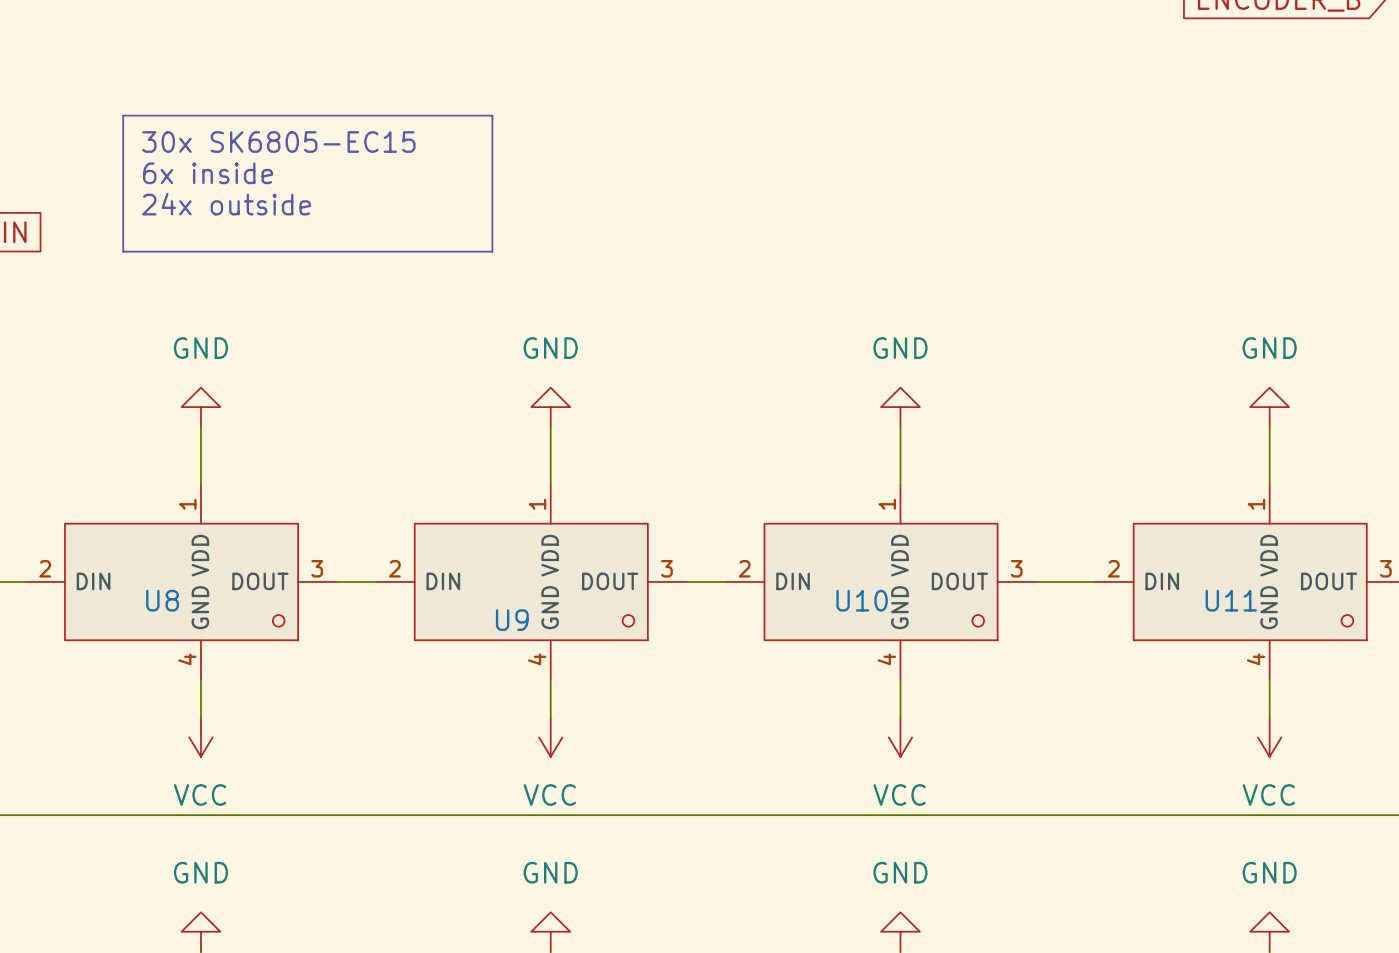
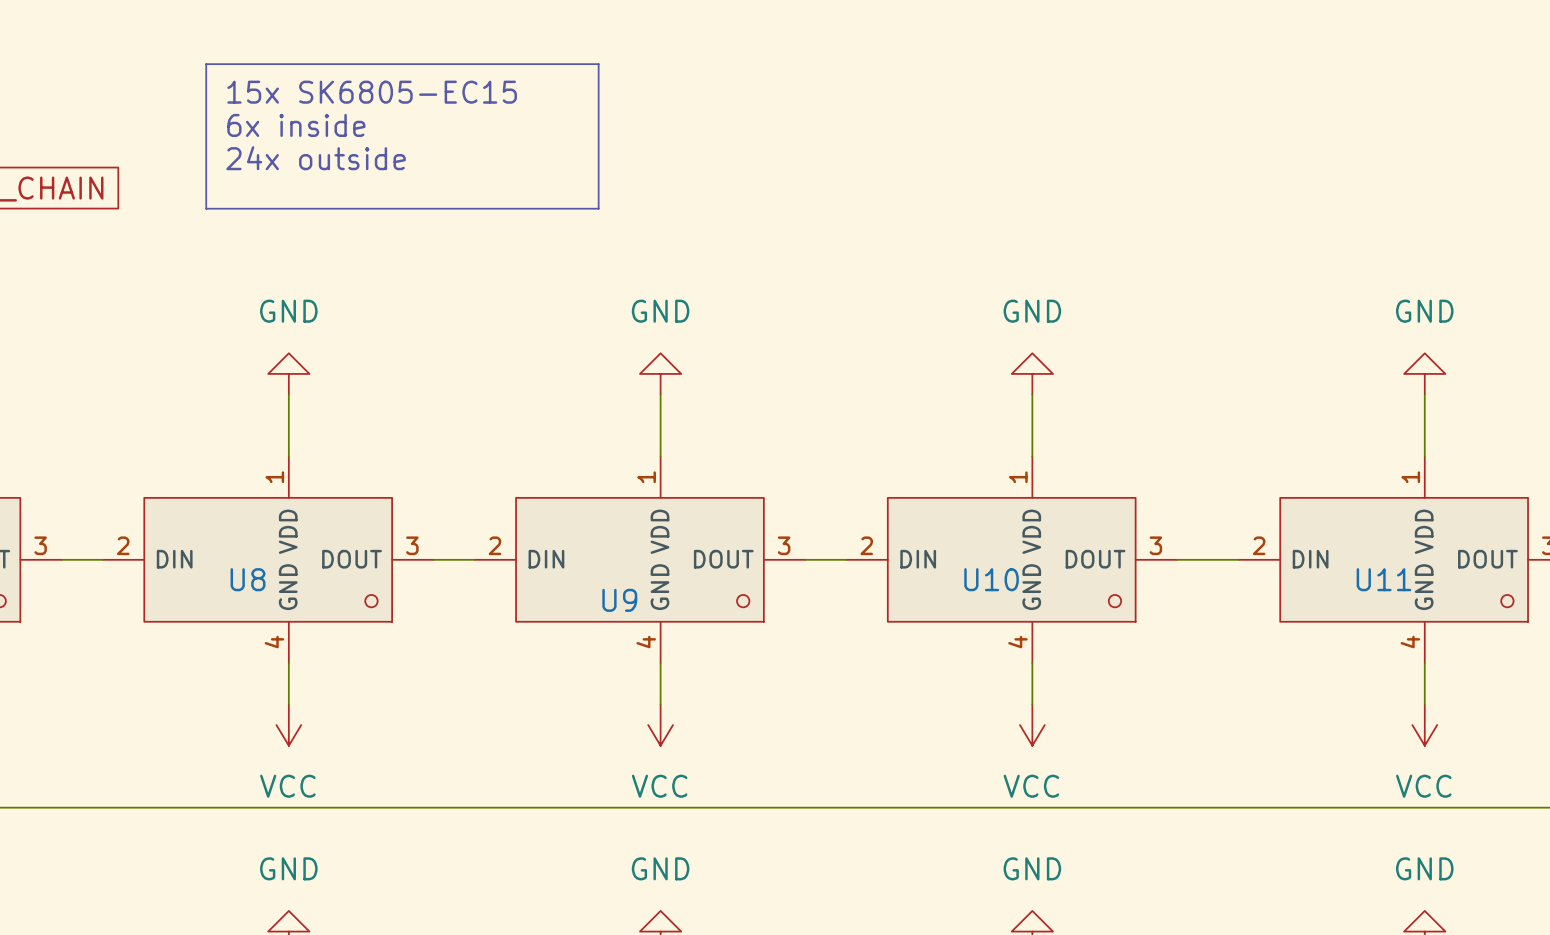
text: 30x SK6805-EC15 (278, 142) -> 15x SK6805-EC15 (372, 92)

